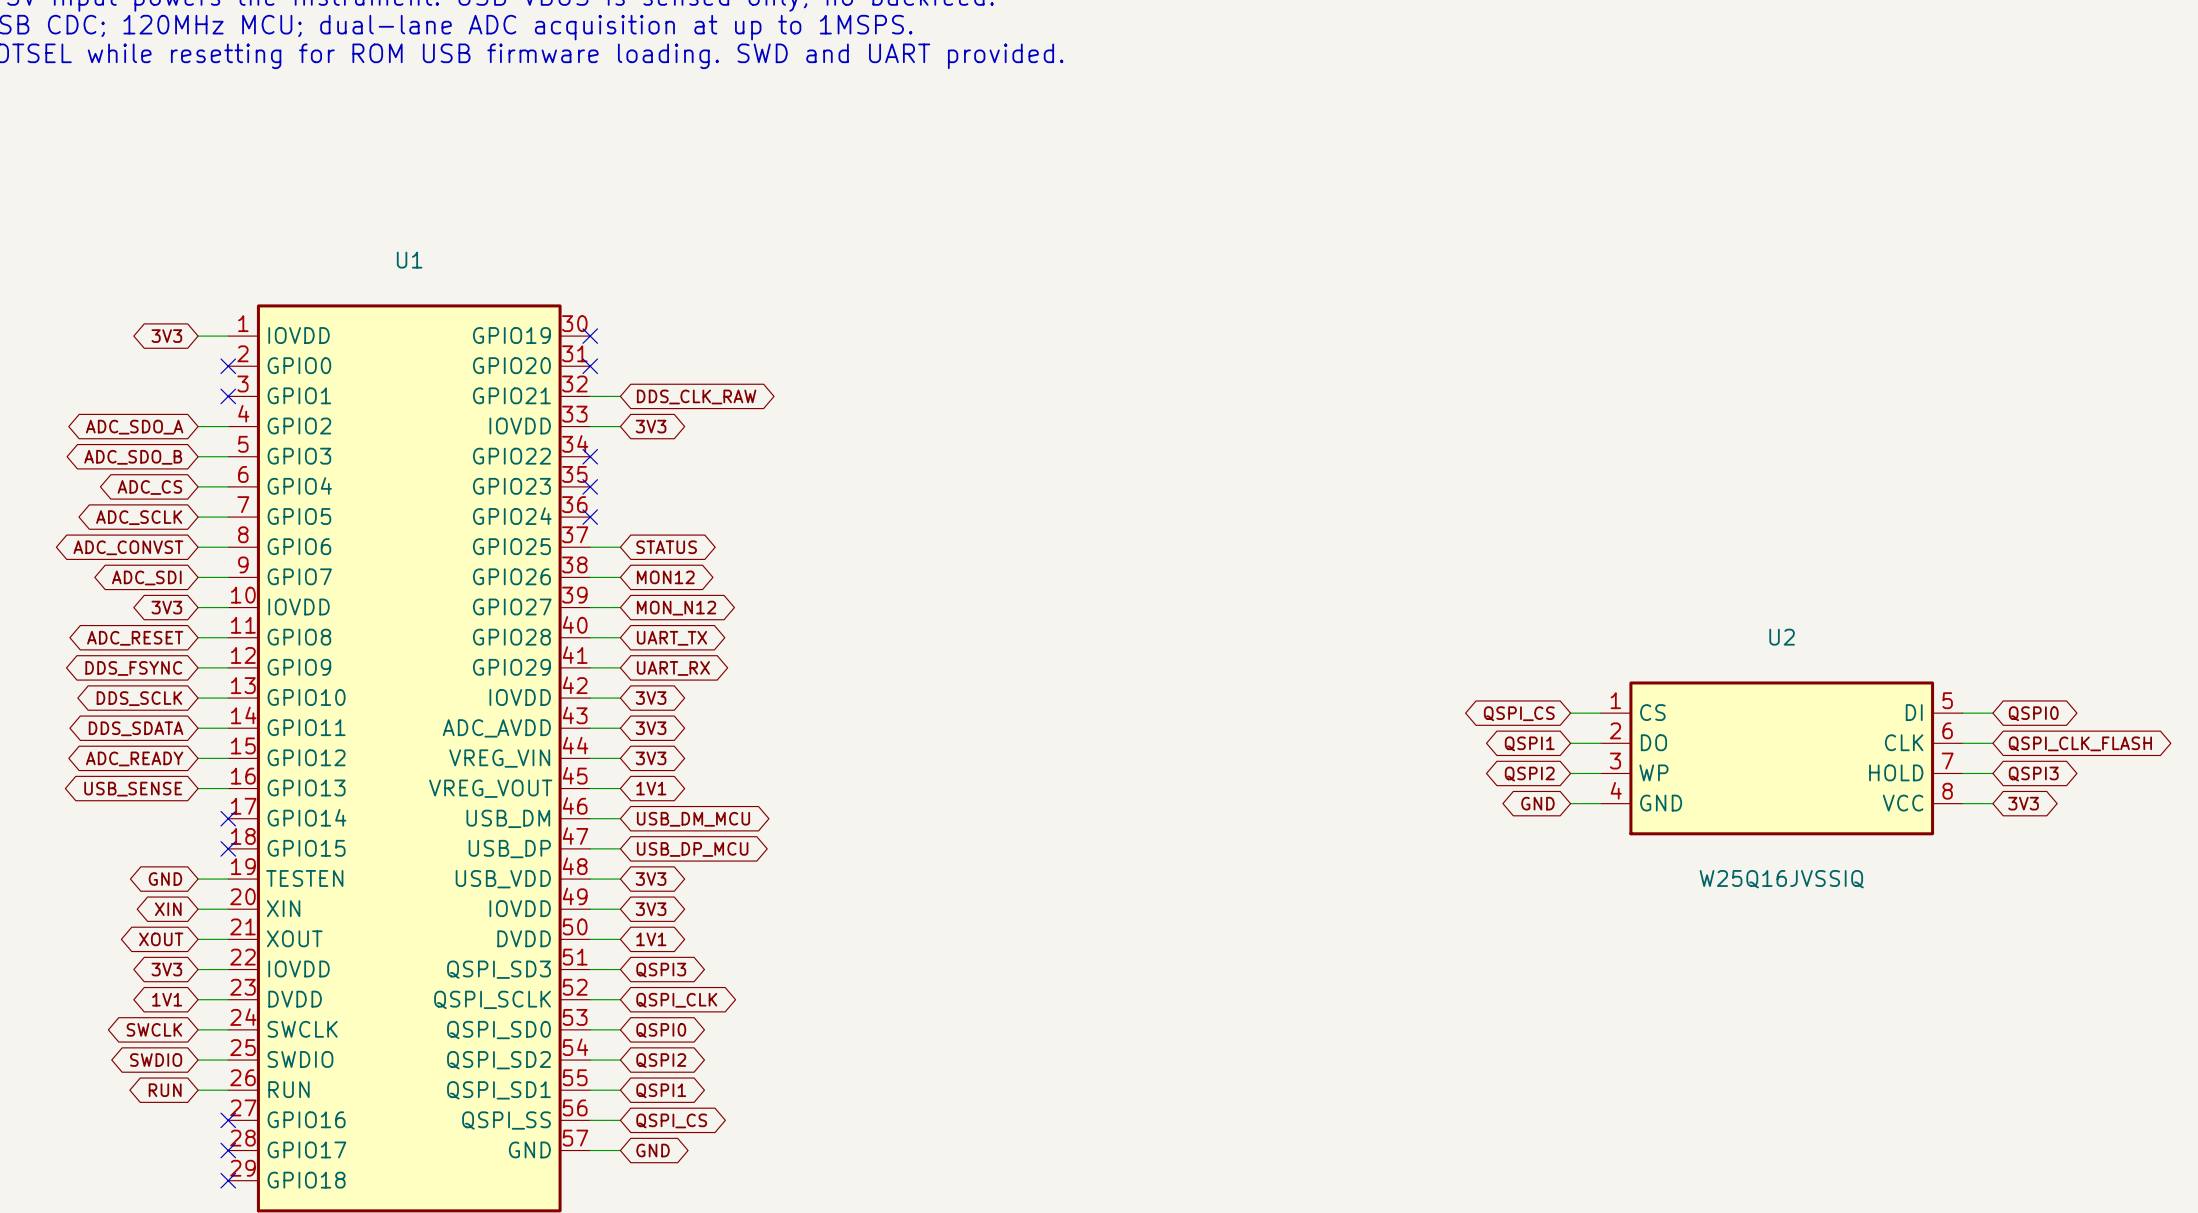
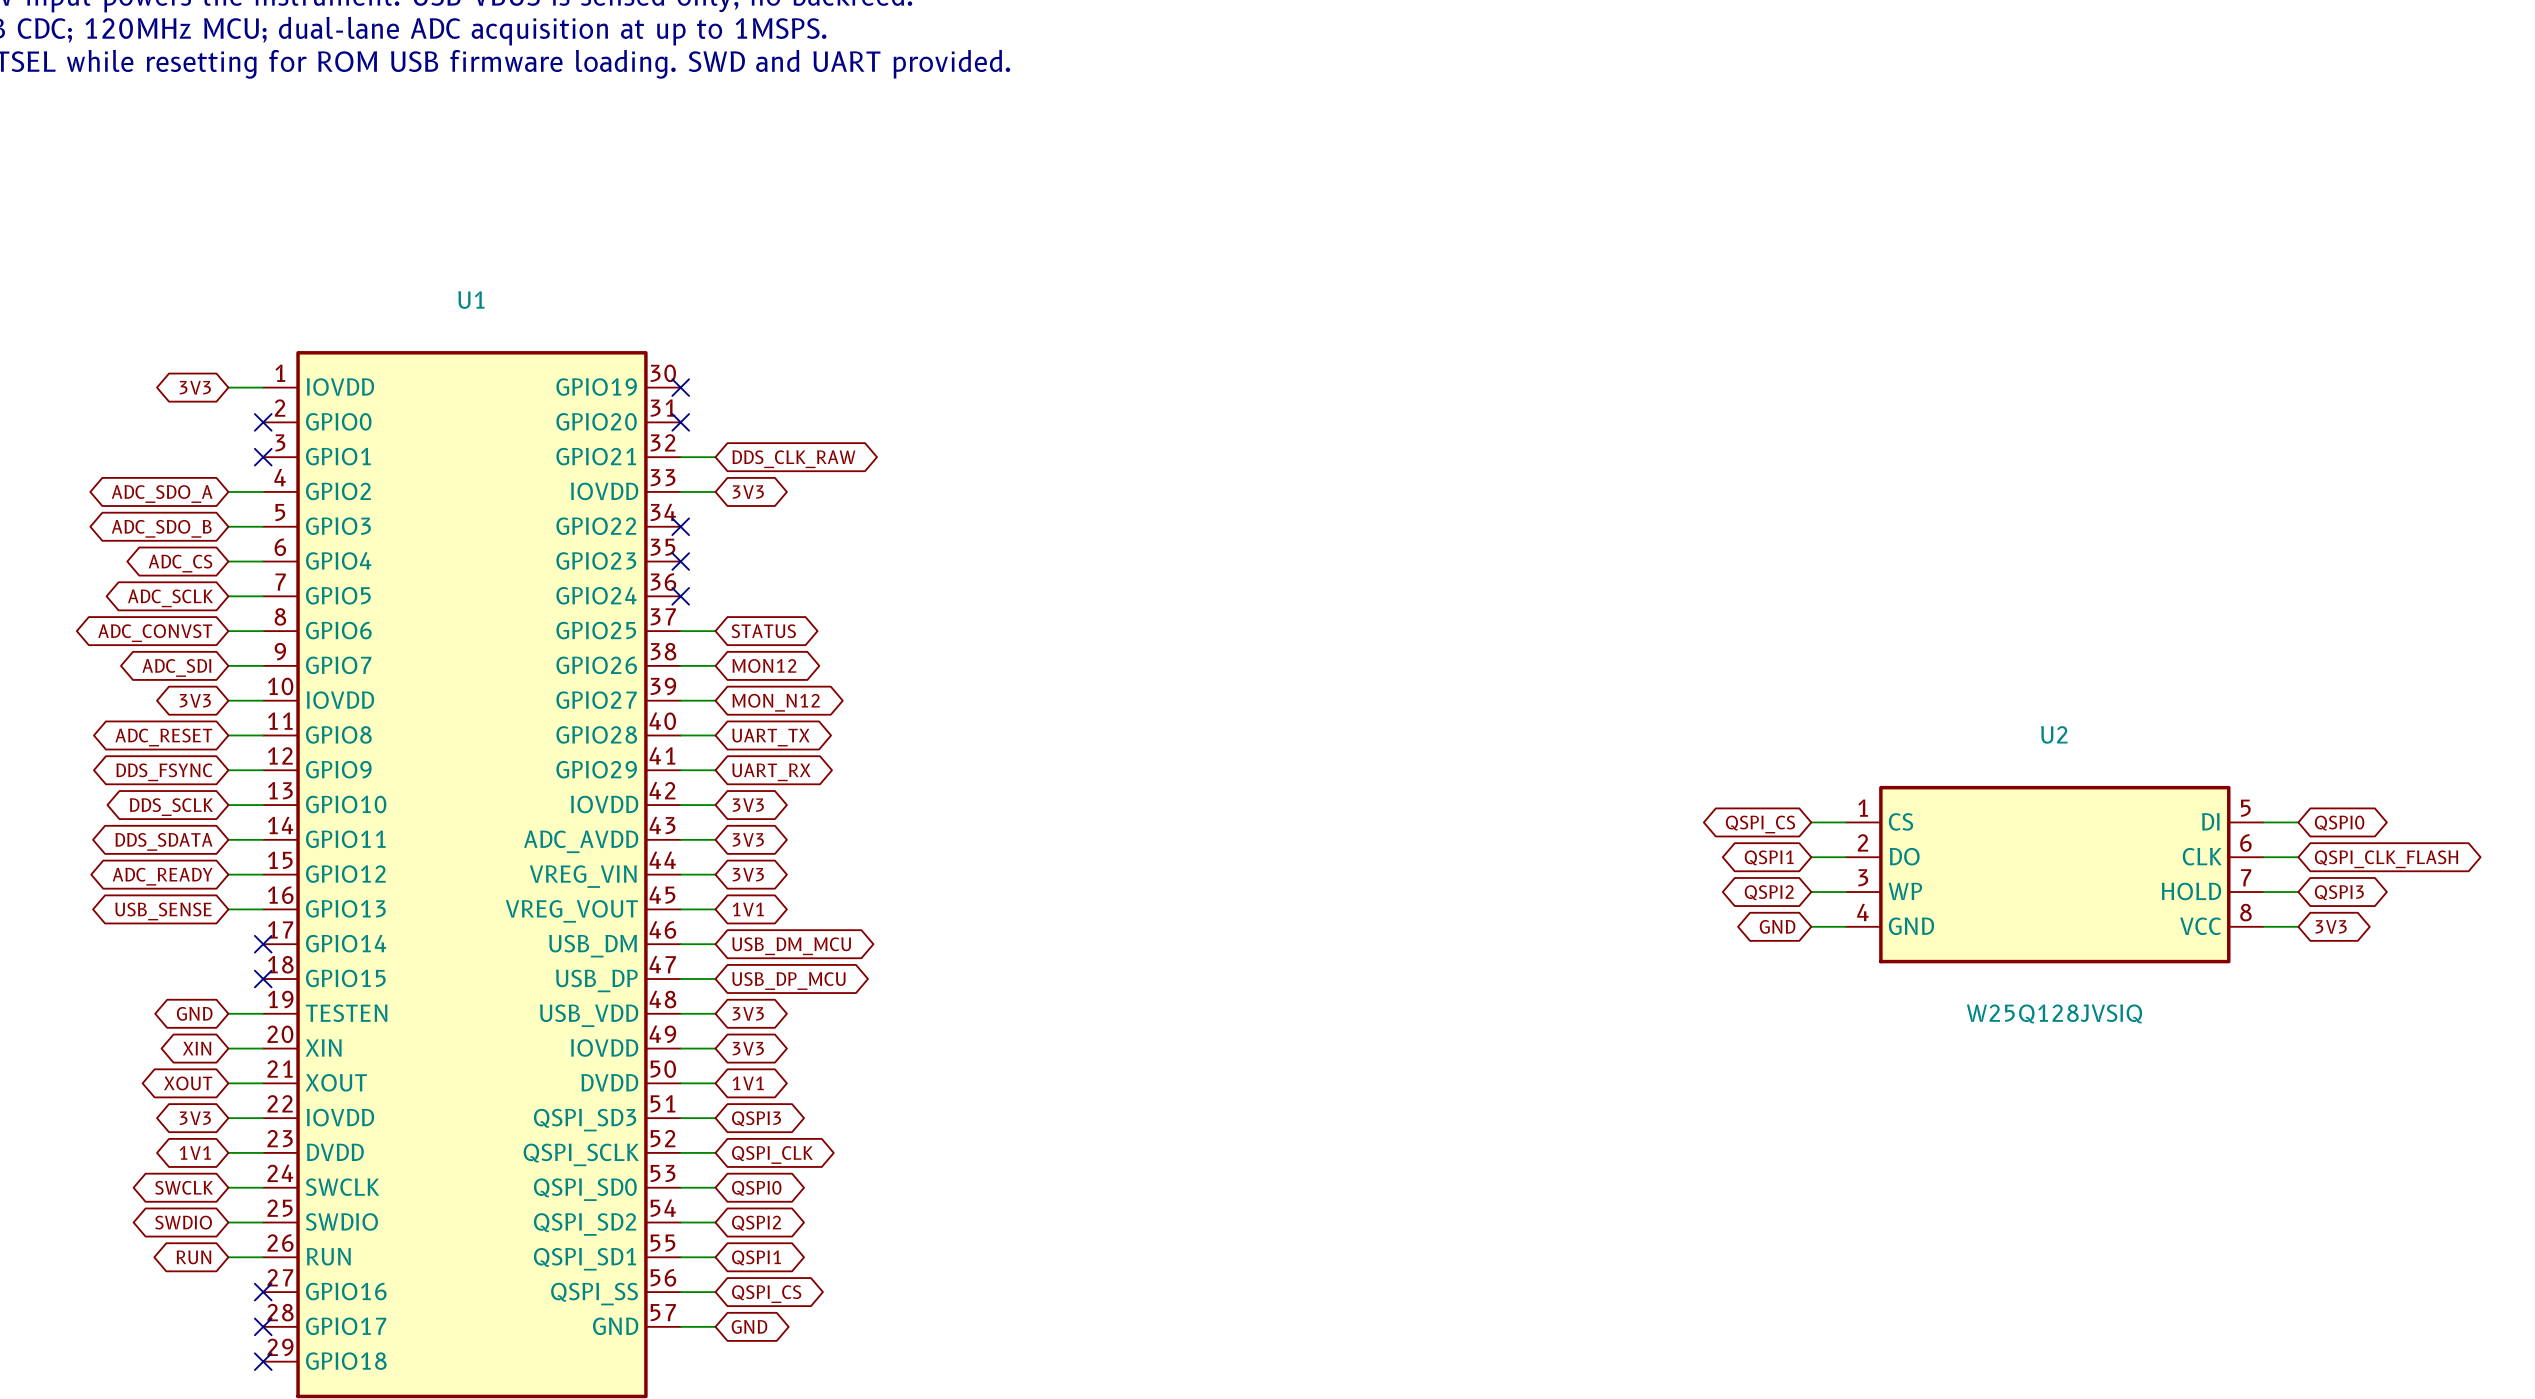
U2 value: W25Q16JVSSIQ (1781, 879) -> W25Q128JVSIQ (2054, 1013)

